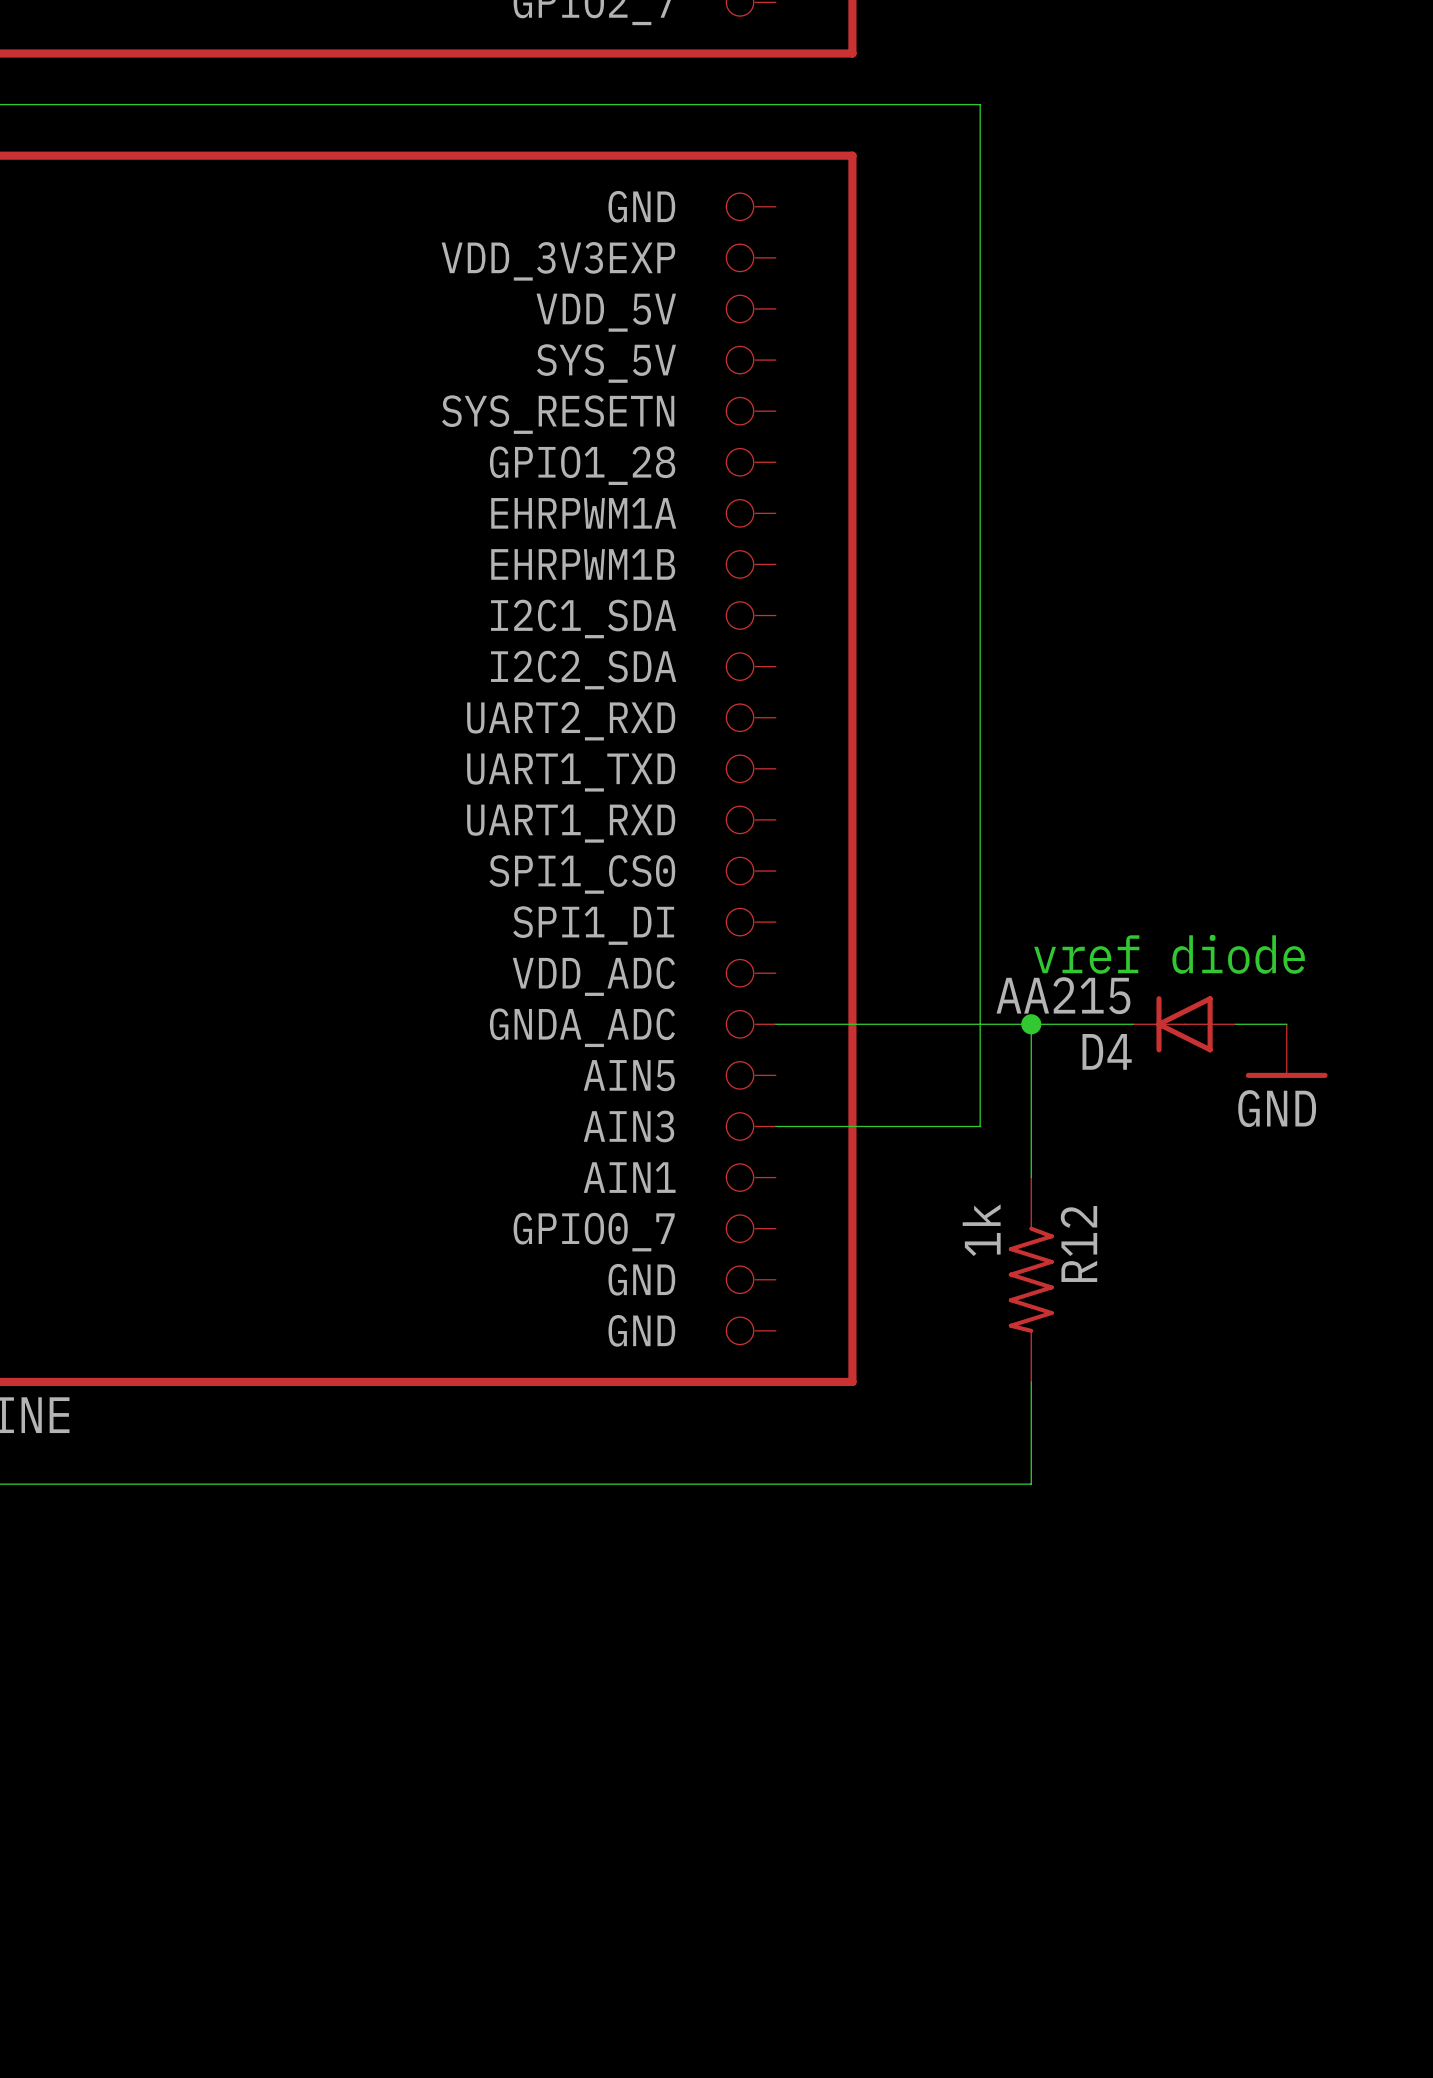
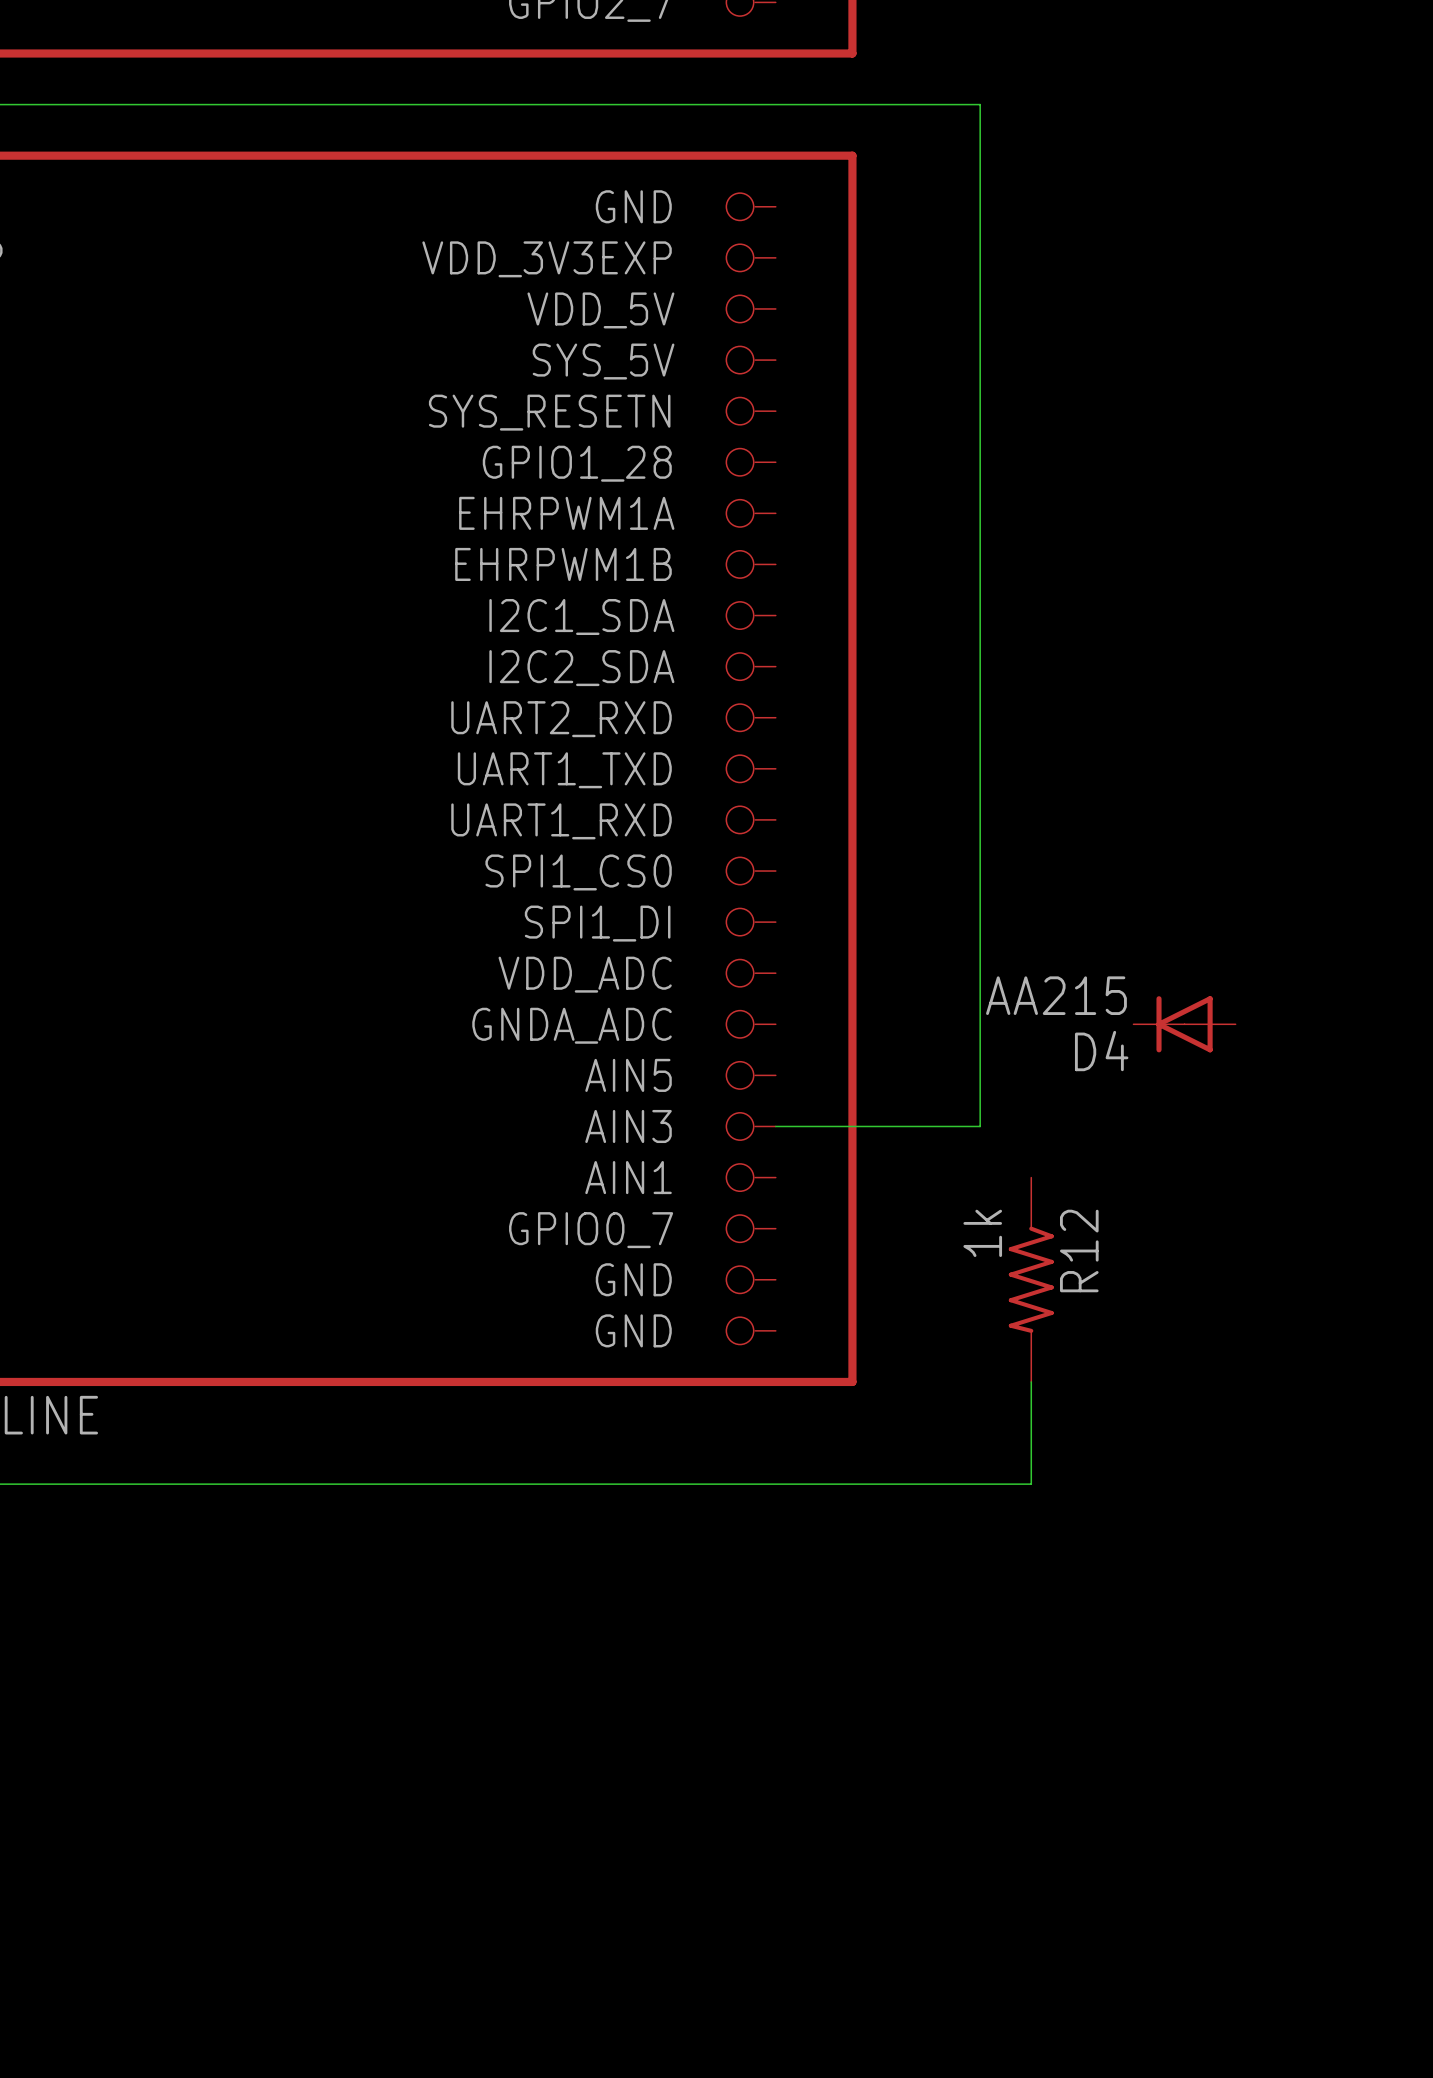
text: vref diode (1169, 954) -> none
wire: (775, 1024) (1133, 1024) -> none
wire: (1031, 1024) (1031, 1177) -> none
junction: (1031, 1024) -> none
wire: (1235, 1024) (1286, 1024) -> none
power symbol: GND (1286, 1051) -> none

